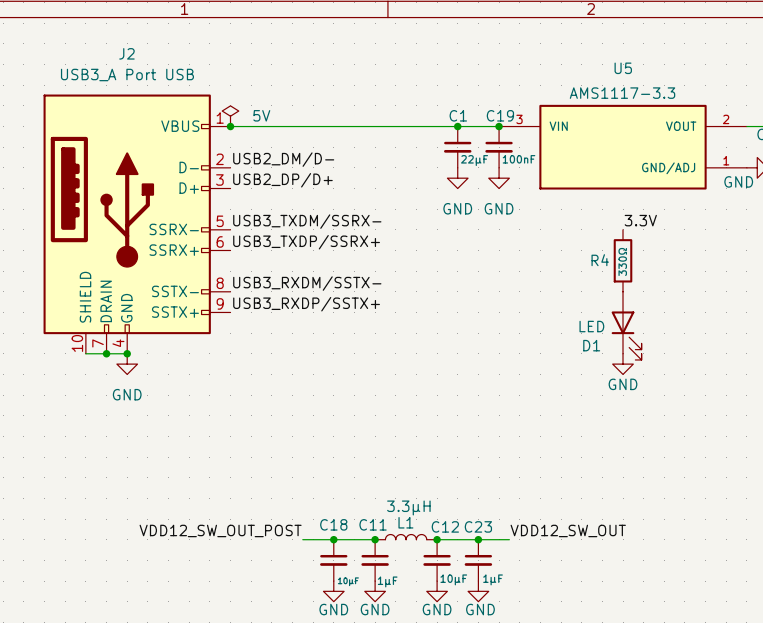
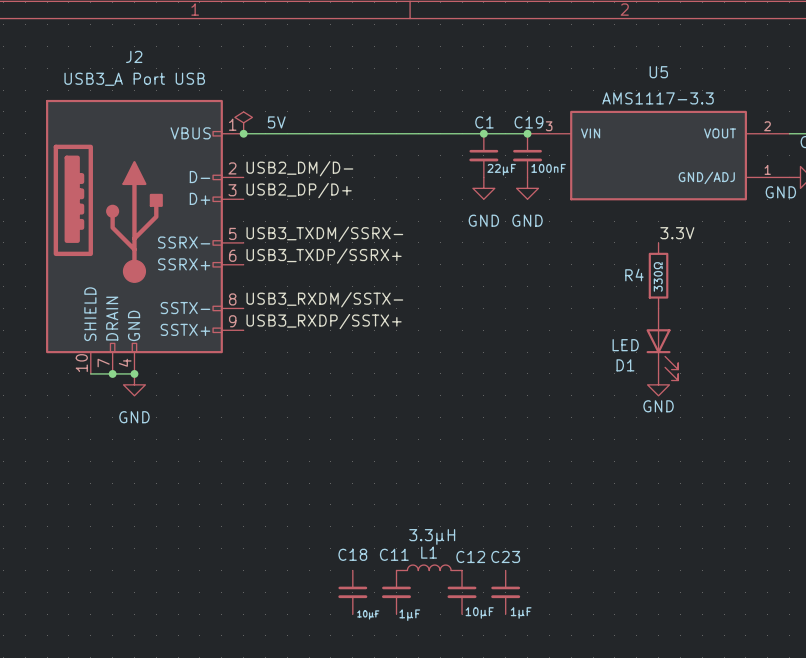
label: VDD12_SW_OUT_POST (220, 530) -> none
label: VDD12_SW_OUT (568, 530) -> none
wire: (302, 539) (375, 539) -> none
junction: (333, 539) -> none
junction: (375, 539) -> none
wire: (437, 539) (509, 539) -> none
junction: (437, 539) -> none
junction: (478, 539) -> none
power symbol: GND (333, 591) -> none
power symbol: GND (375, 591) -> none
power symbol: GND (437, 591) -> none
power symbol: GND (478, 591) -> none

